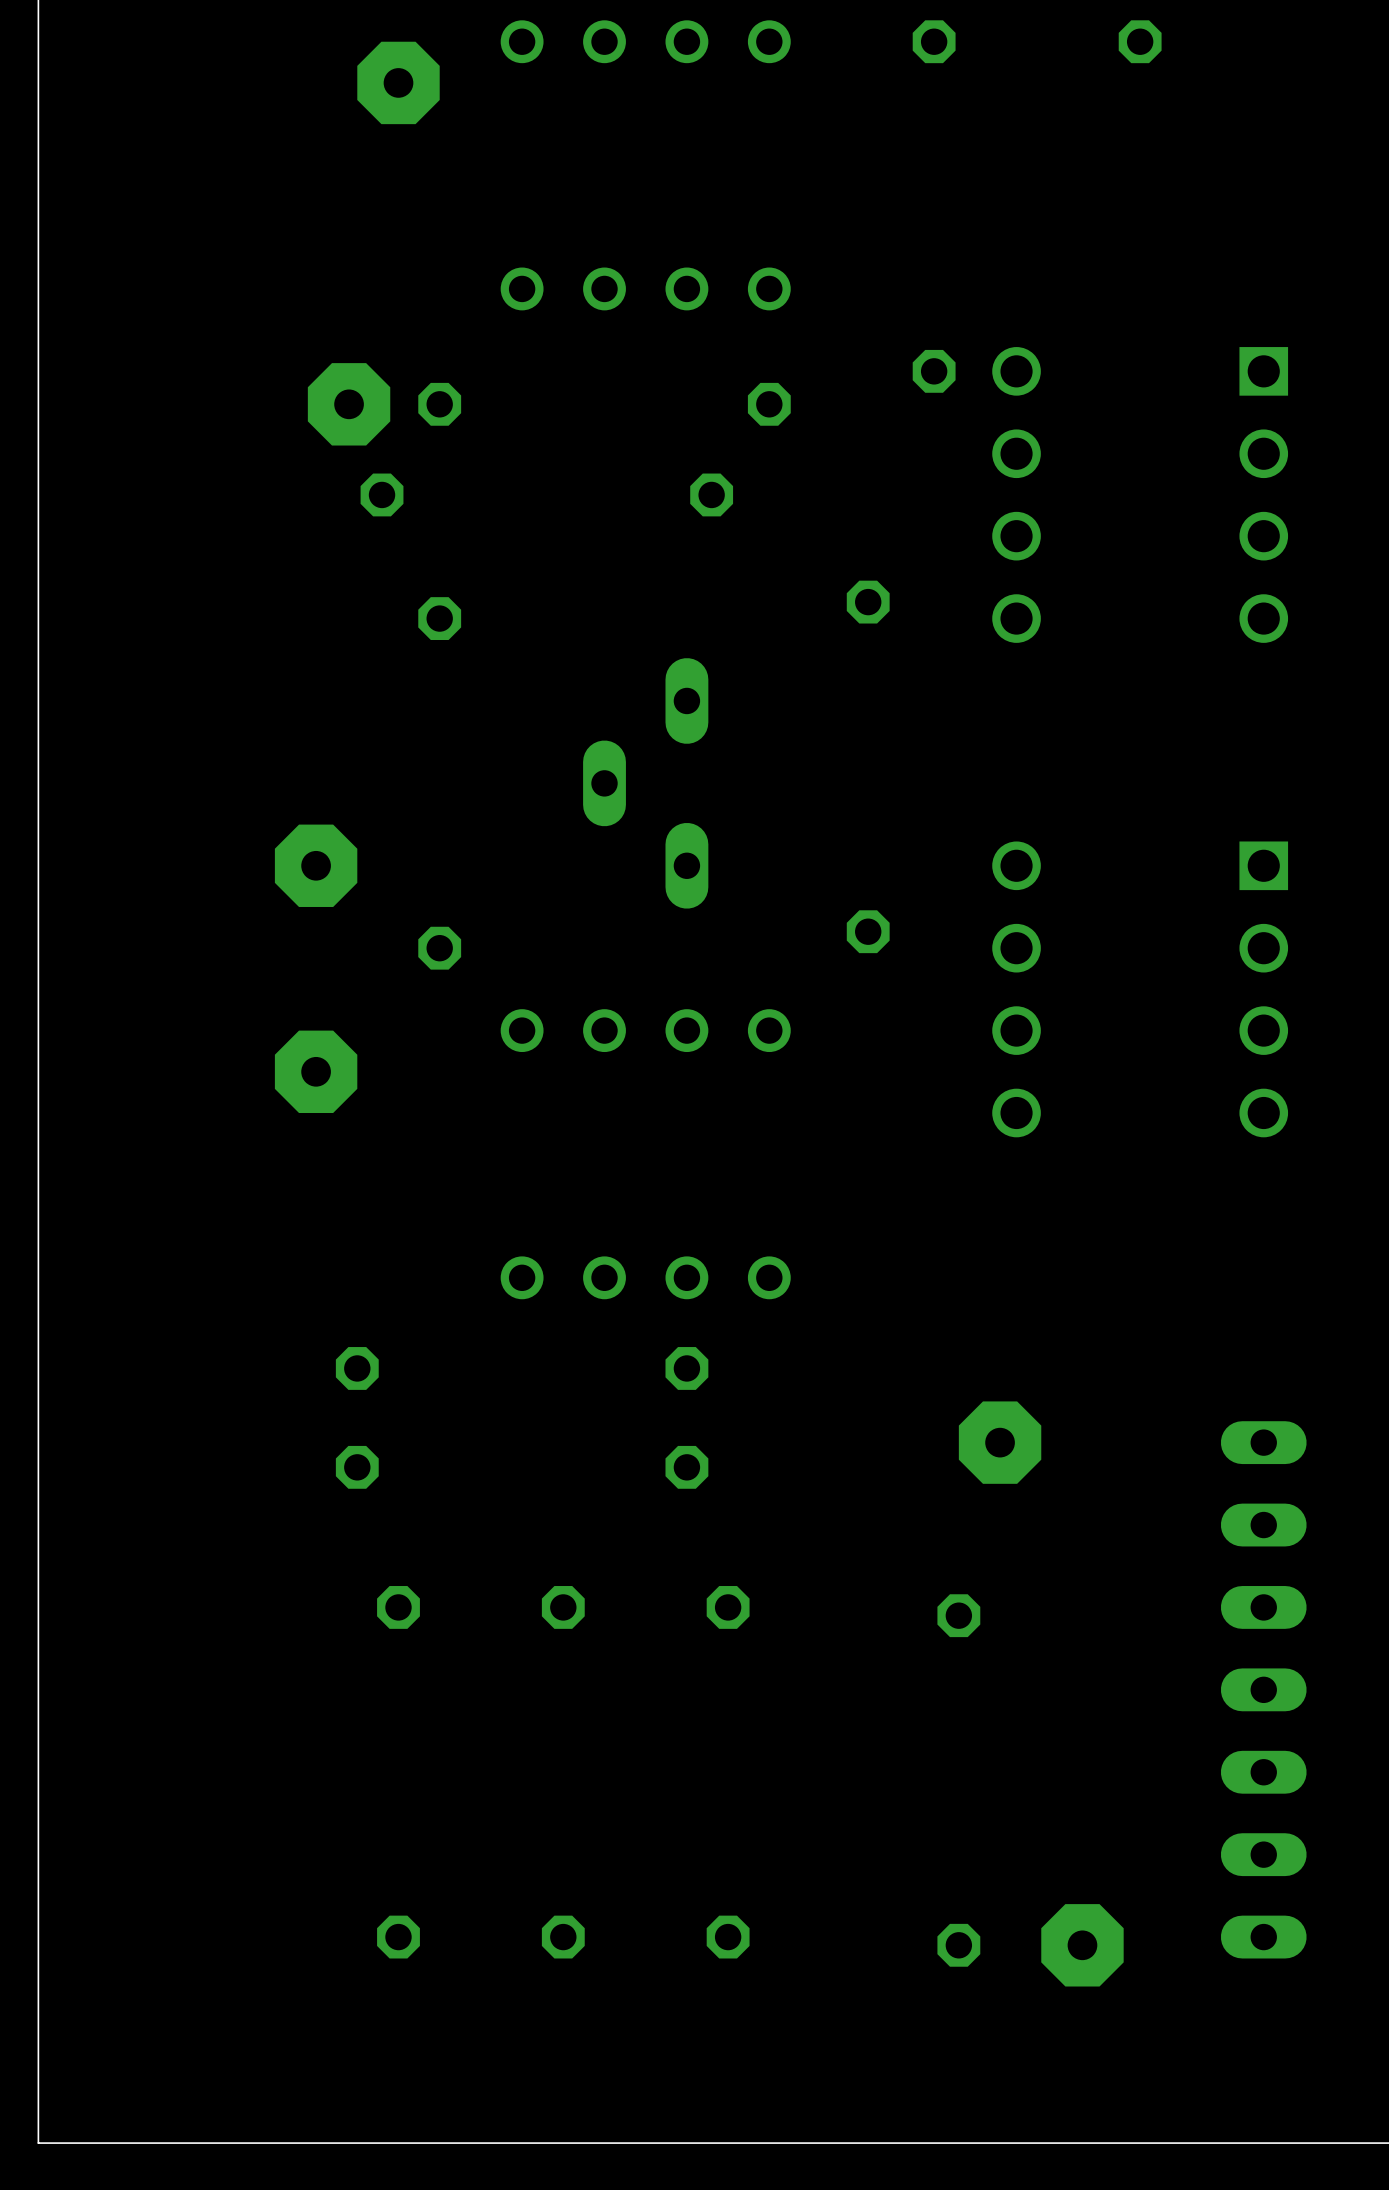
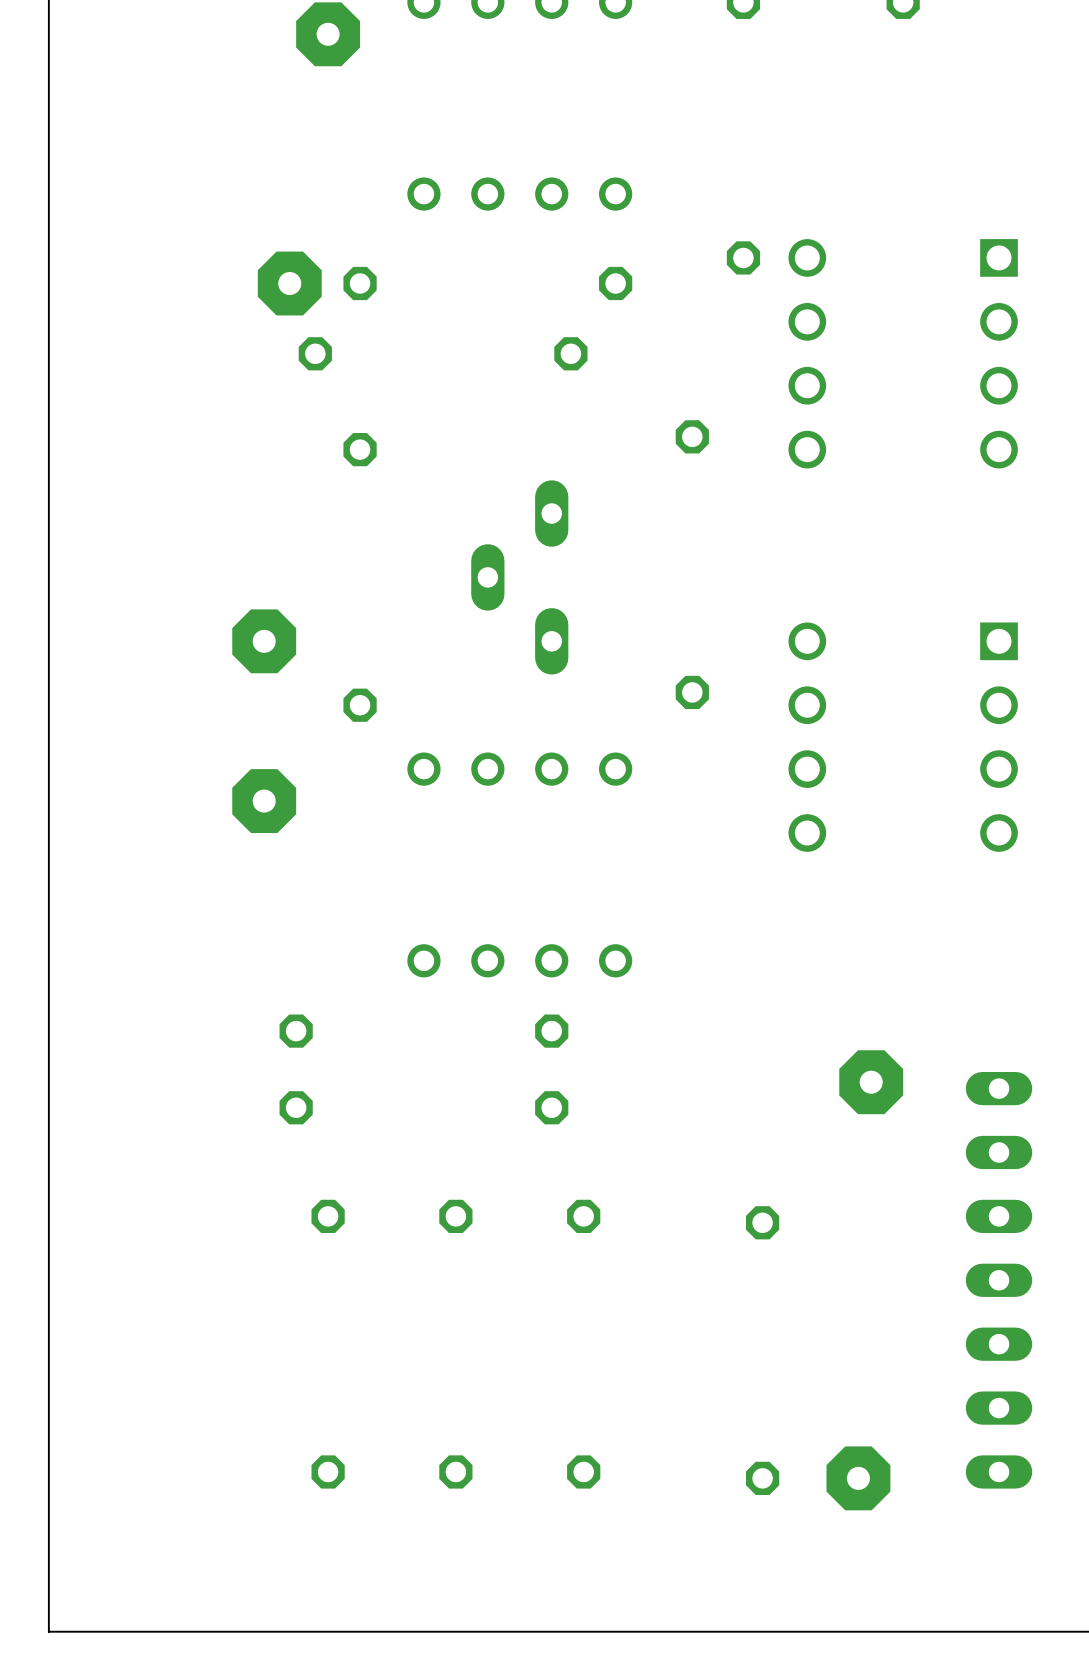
part position: (1000, 1442) -> (871, 1082)

